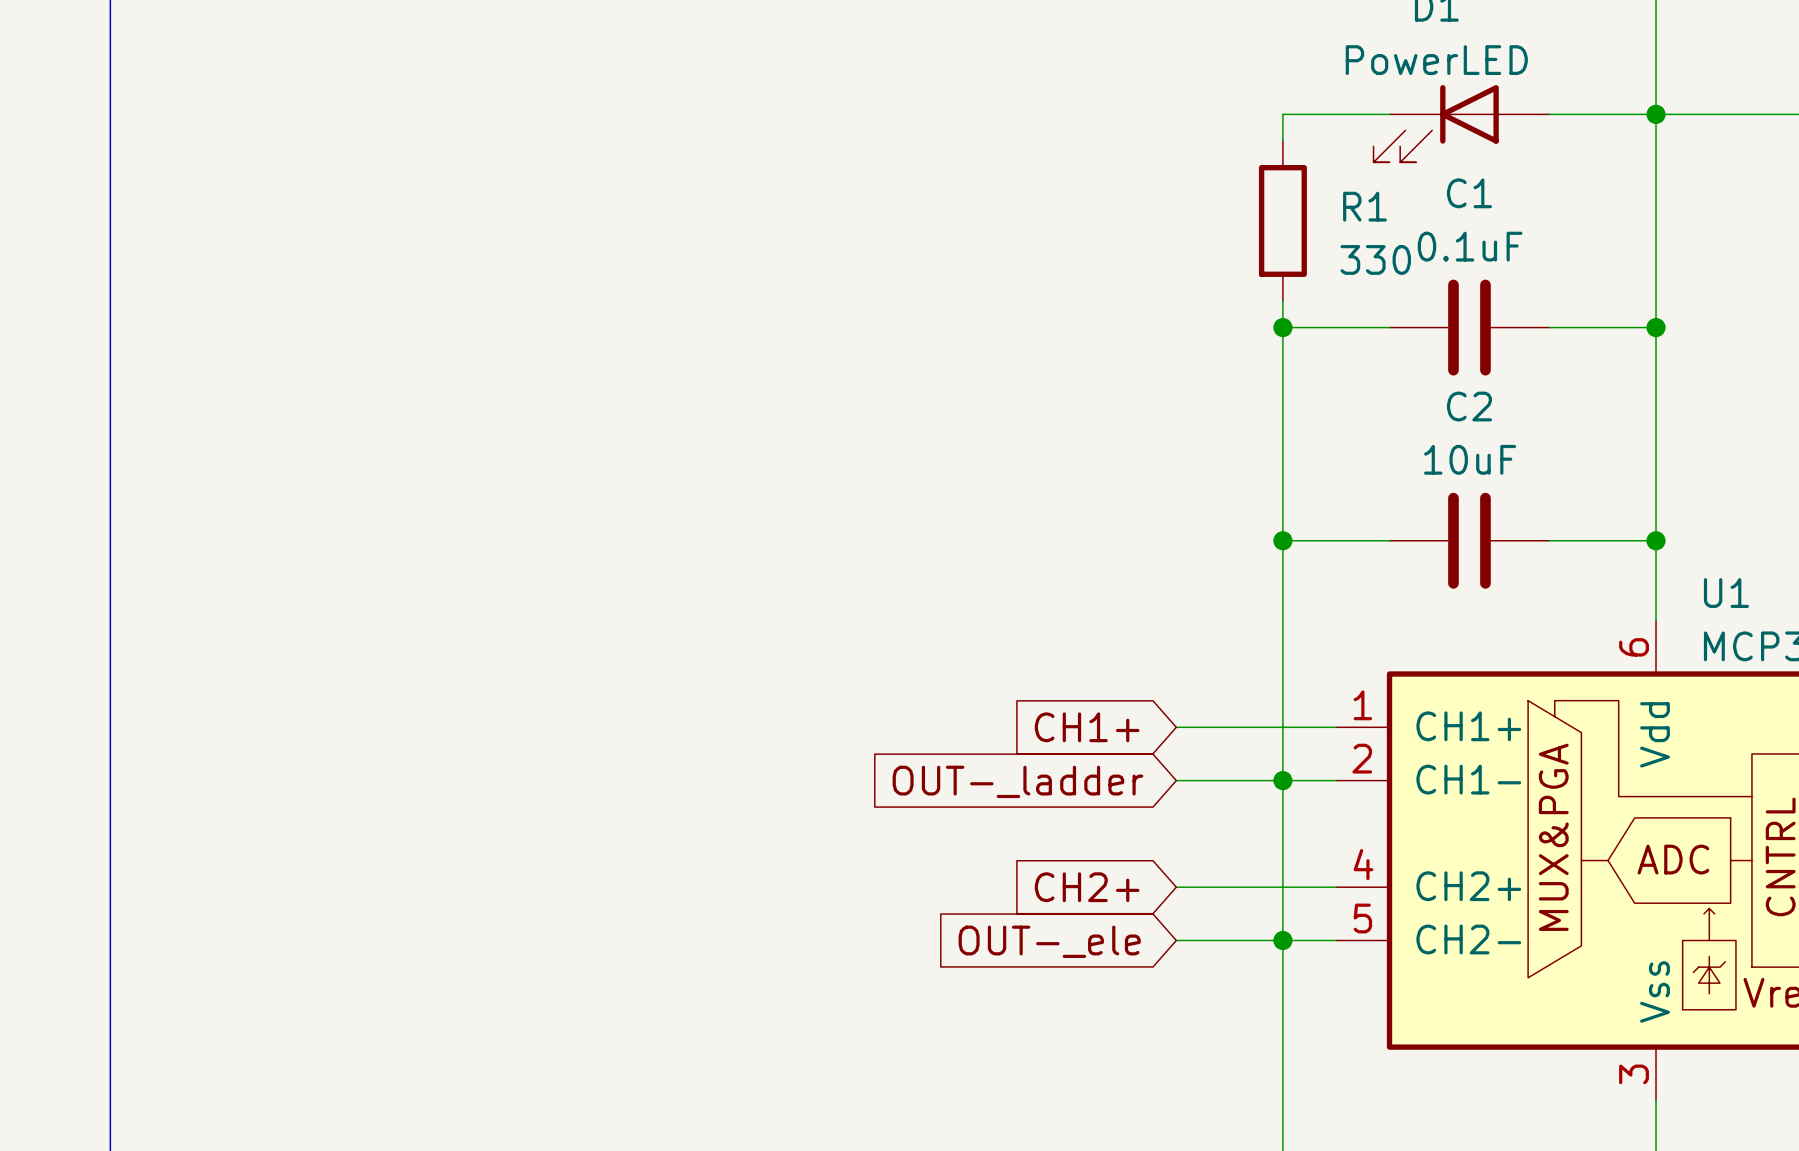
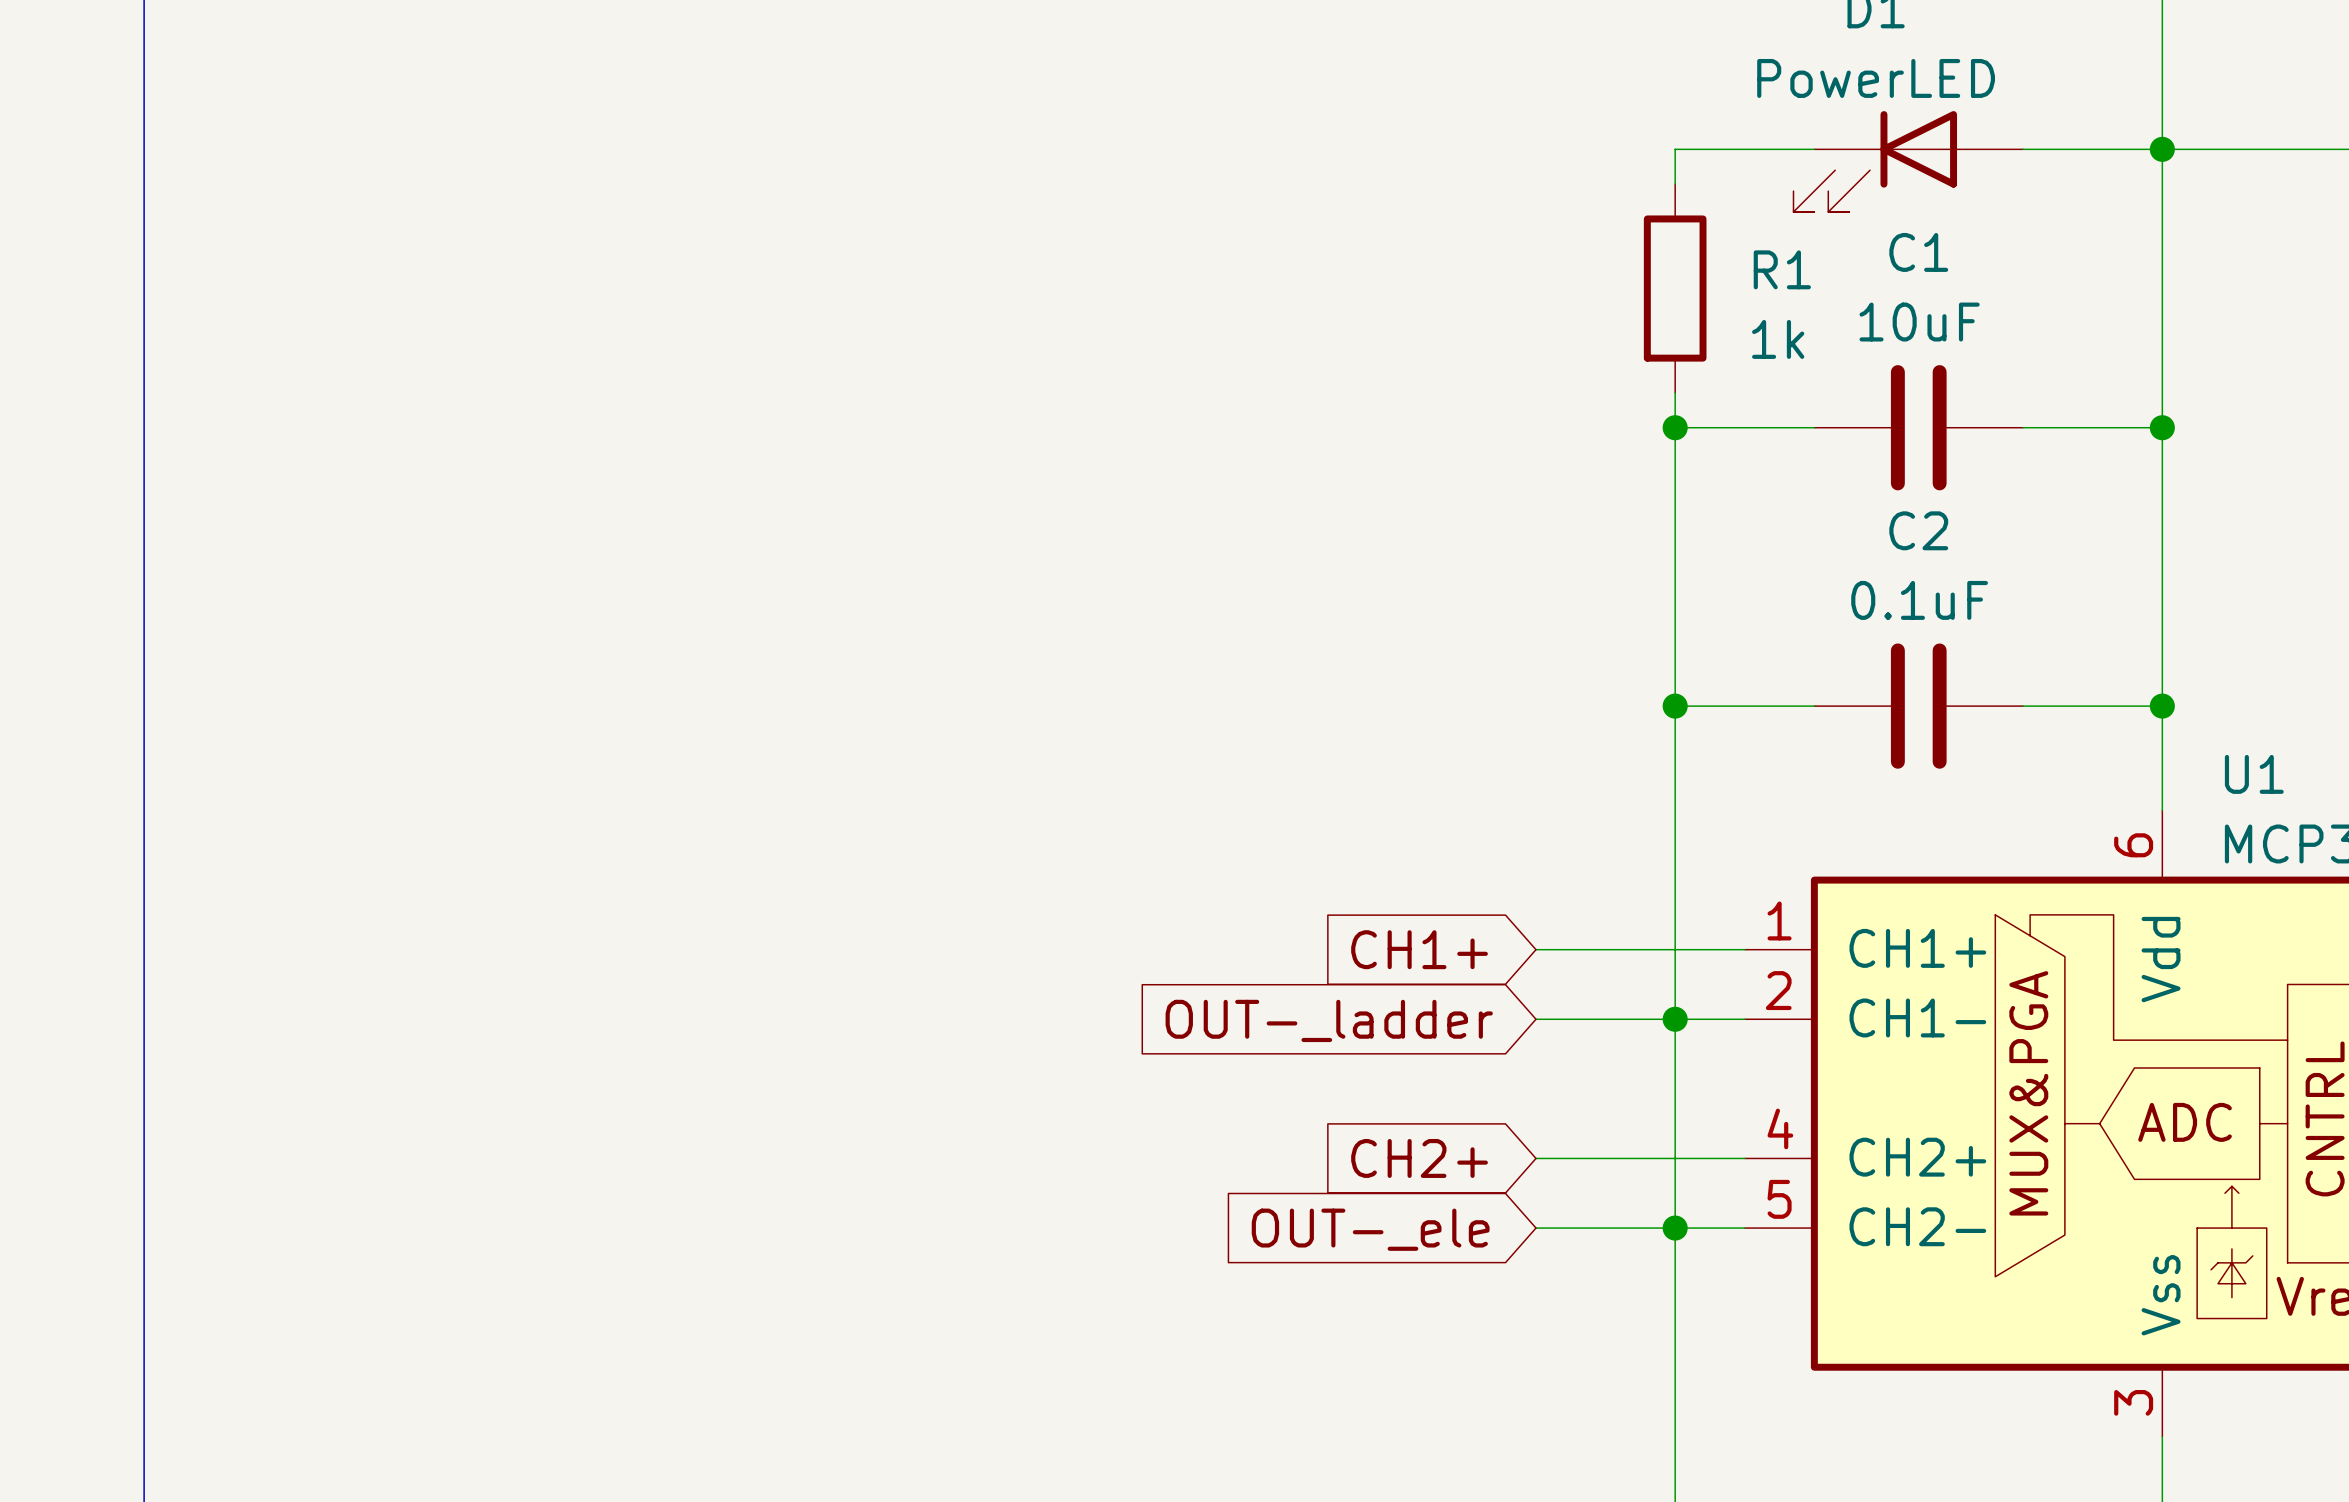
C1 value: 0.1uF (1470, 246) -> 10uF (1919, 322)
R1 value: 330 (1375, 259) -> 1k (1778, 339)
C2 value: 10uF (1470, 459) -> 0.1uF (1919, 600)

